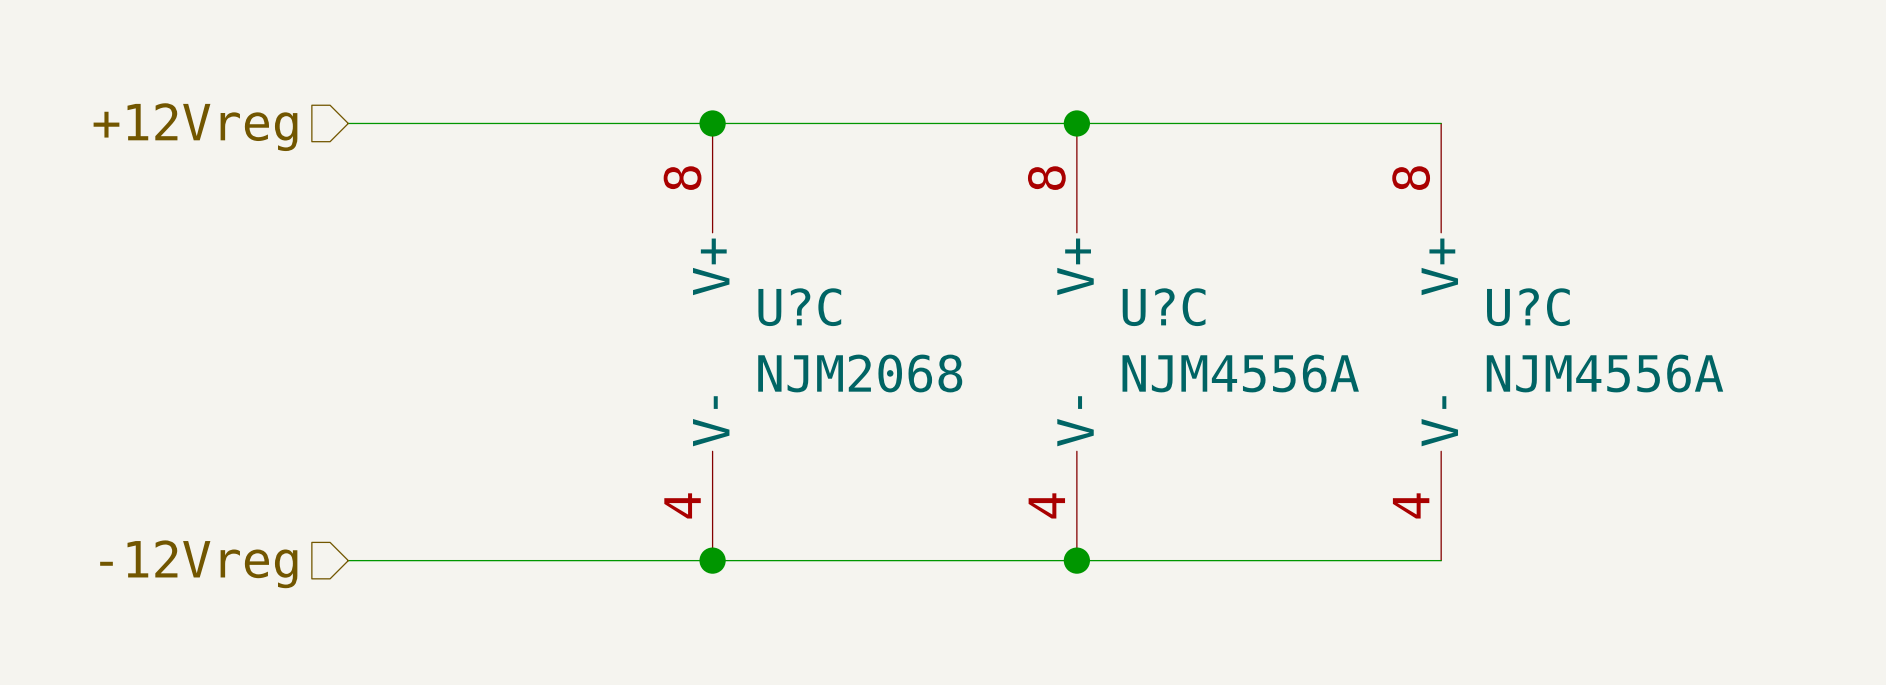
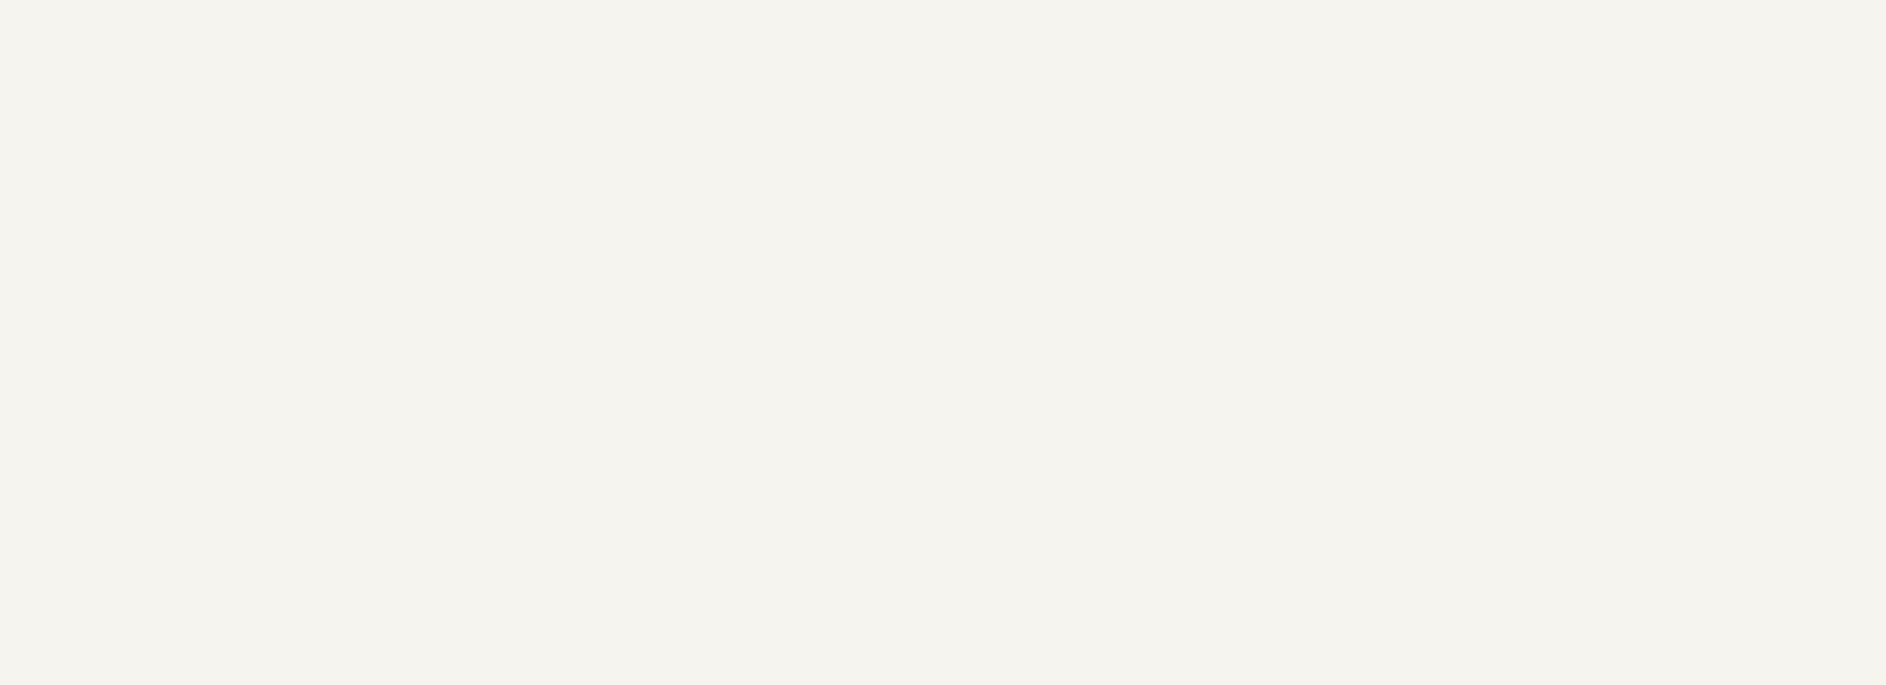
wire: (348, 123) (1441, 123) -> none
junction: (712, 123) -> none
junction: (1076, 123) -> none
hierarchical label: +12Vreg (195, 127) -> none
U?C: NJM2068 (712, 342) -> none
U?C: NJM4556A (1076, 342) -> none
U?C: NJM4556A (1441, 342) -> none
wire: (348, 560) (1441, 560) -> none
junction: (712, 560) -> none
junction: (1076, 560) -> none
hierarchical label: -12Vreg (198, 564) -> none

